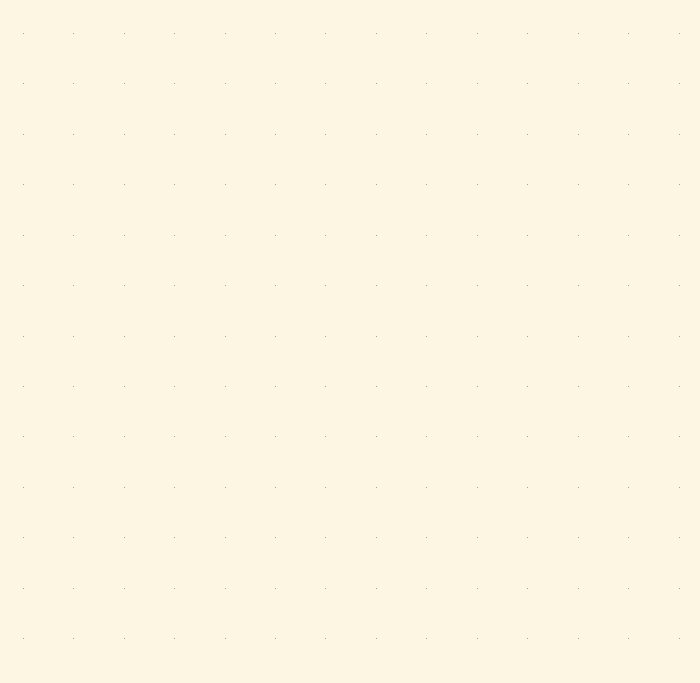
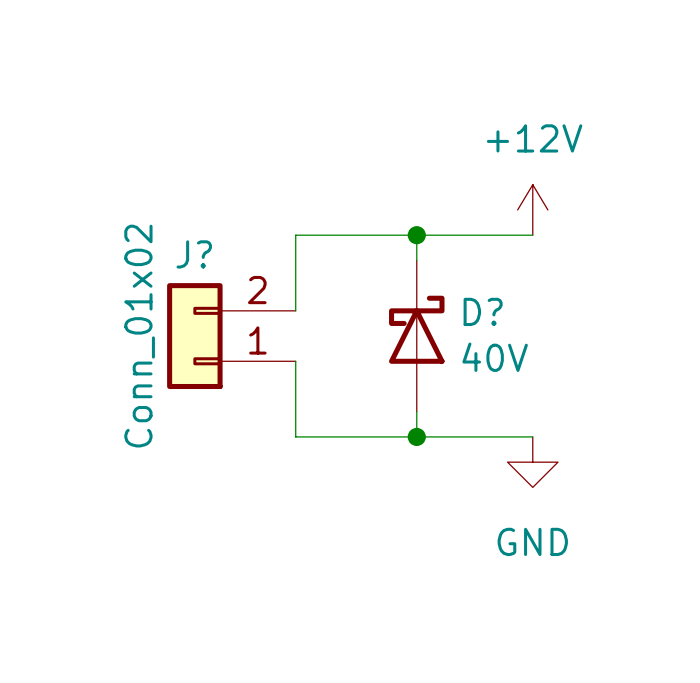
power symbol: none -> +12V (532, 209)
wire: none -> (416, 235) (416, 260)
junction: none -> (416, 235)
wire: none -> (532, 235) (295, 235) (295, 310)
J?: none -> Conn_01x02 (231, 336)
D?: none -> 40V (416, 336)
wire: none -> (295, 361) (295, 436) (532, 436)
wire: none -> (416, 411) (416, 436)
junction: none -> (416, 436)
power symbol: none -> GND (532, 462)

